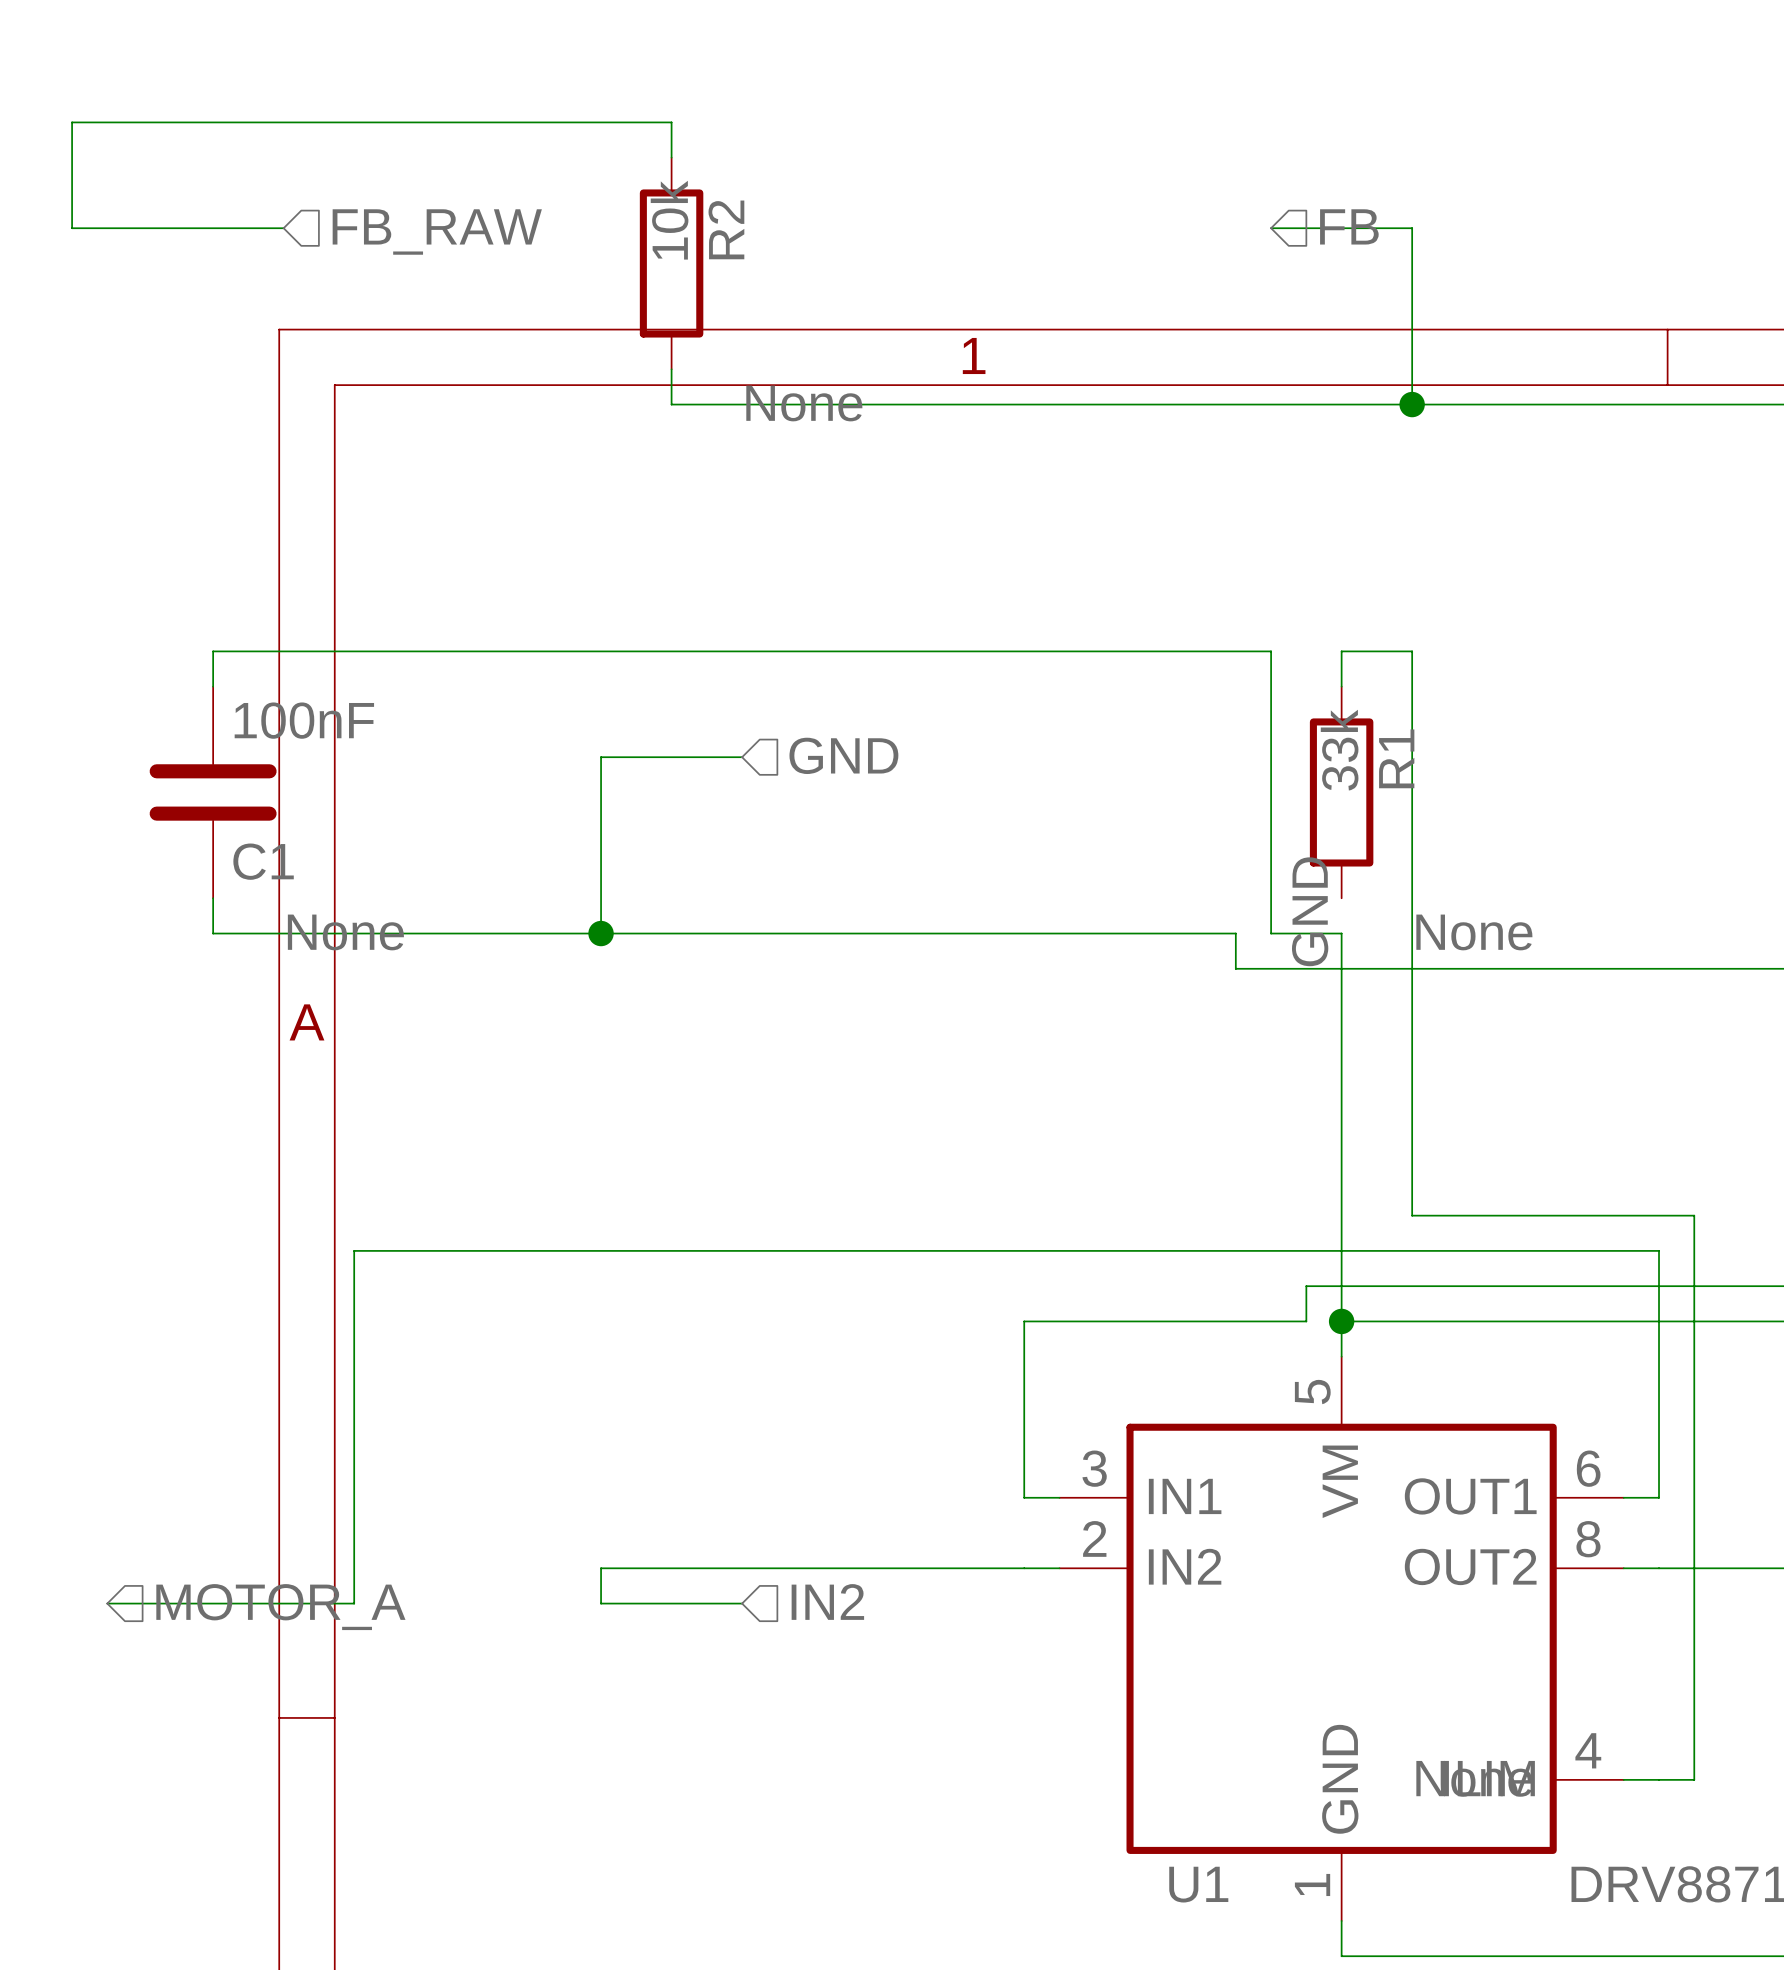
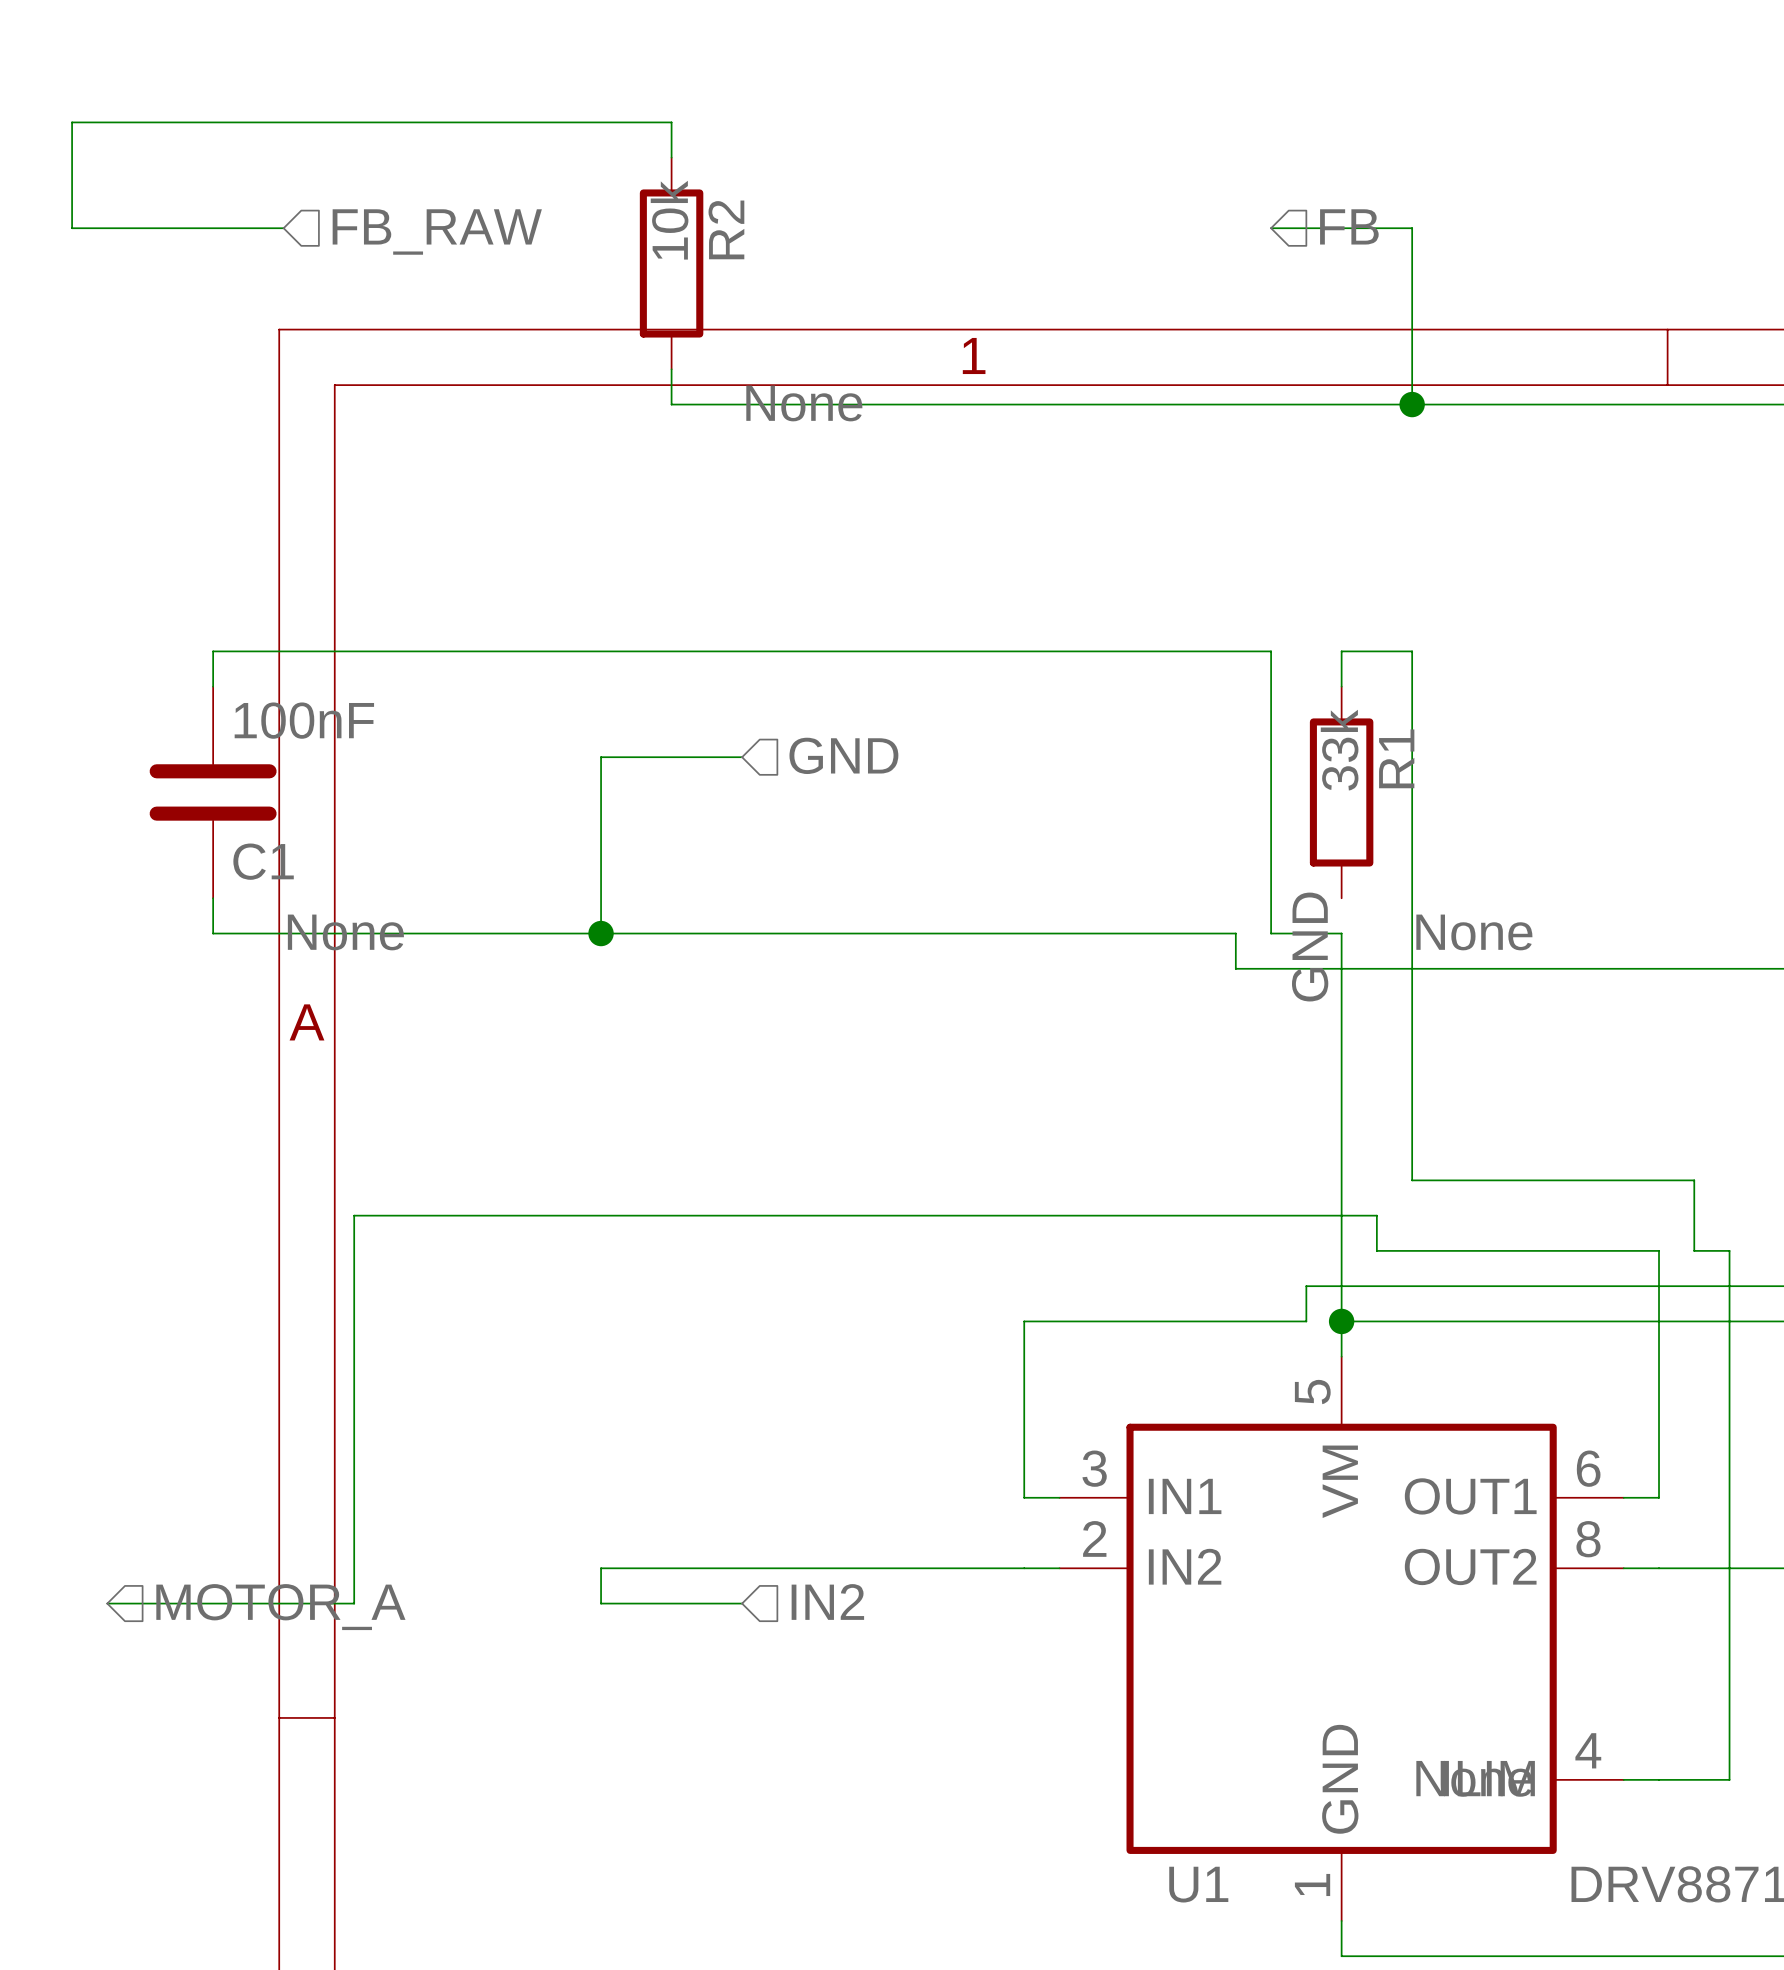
label position: GND (1310, 911) -> GND (1310, 947)
wire: (1412, 1180) (1412, 1215) (1694, 1215) -> (1412, 1180) (1694, 1180) (1694, 1215)
wire: (354, 1250) (1376, 1250) -> (354, 1250) (354, 1215) (1376, 1215) (1376, 1250)
wire: (1694, 1250) (1694, 1779) -> (1694, 1250) (1729, 1250) (1729, 1779) (1694, 1779)

